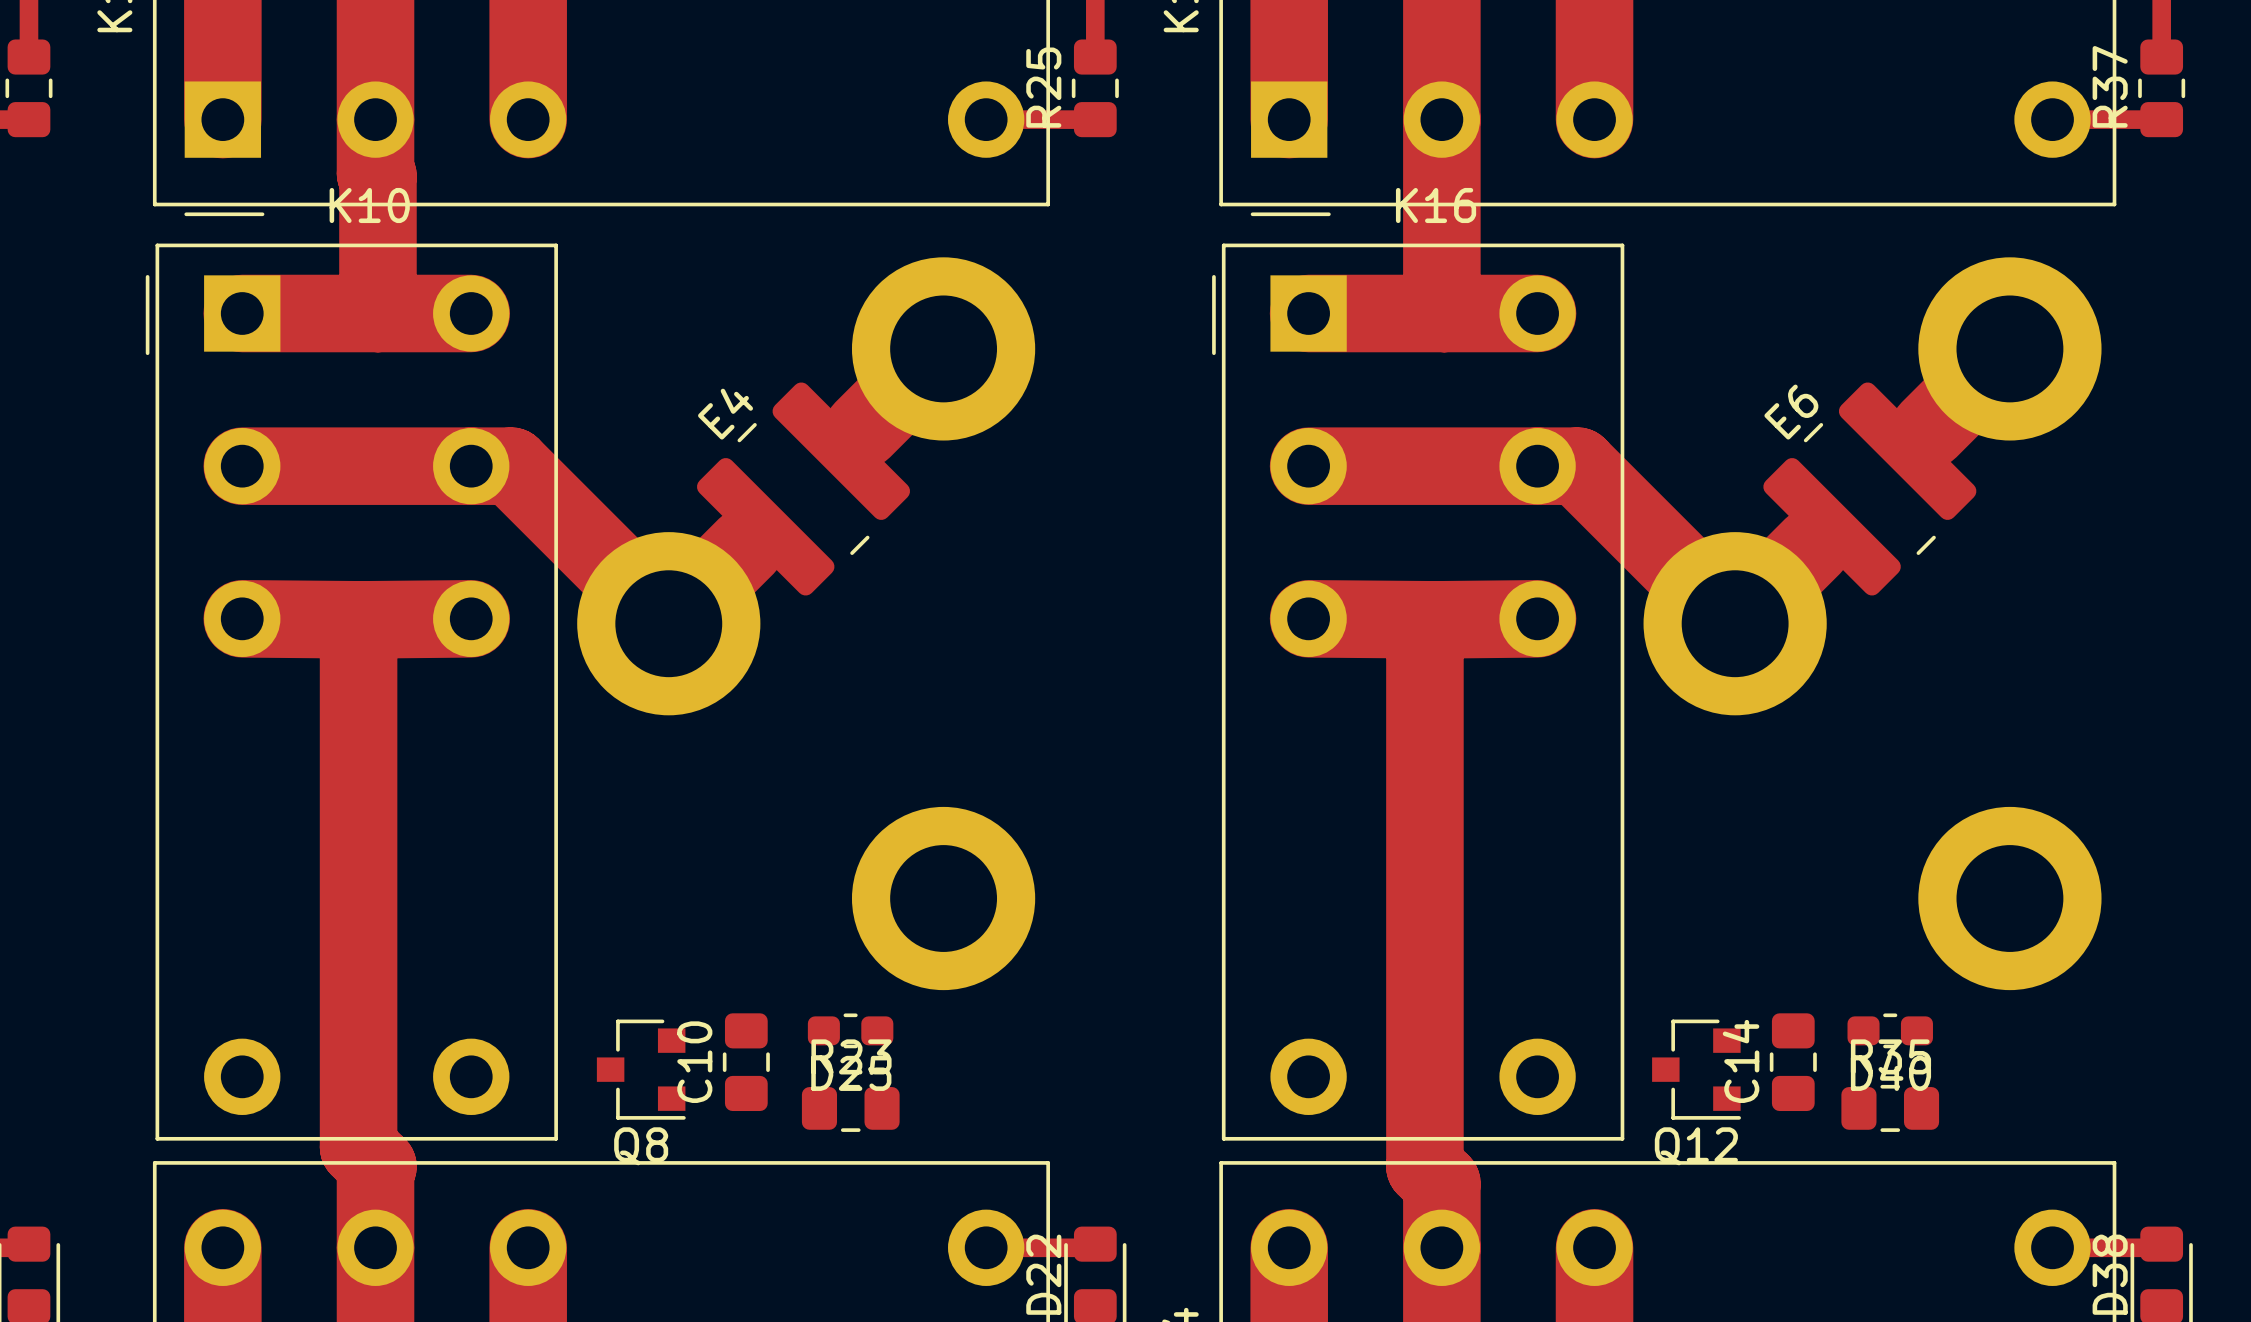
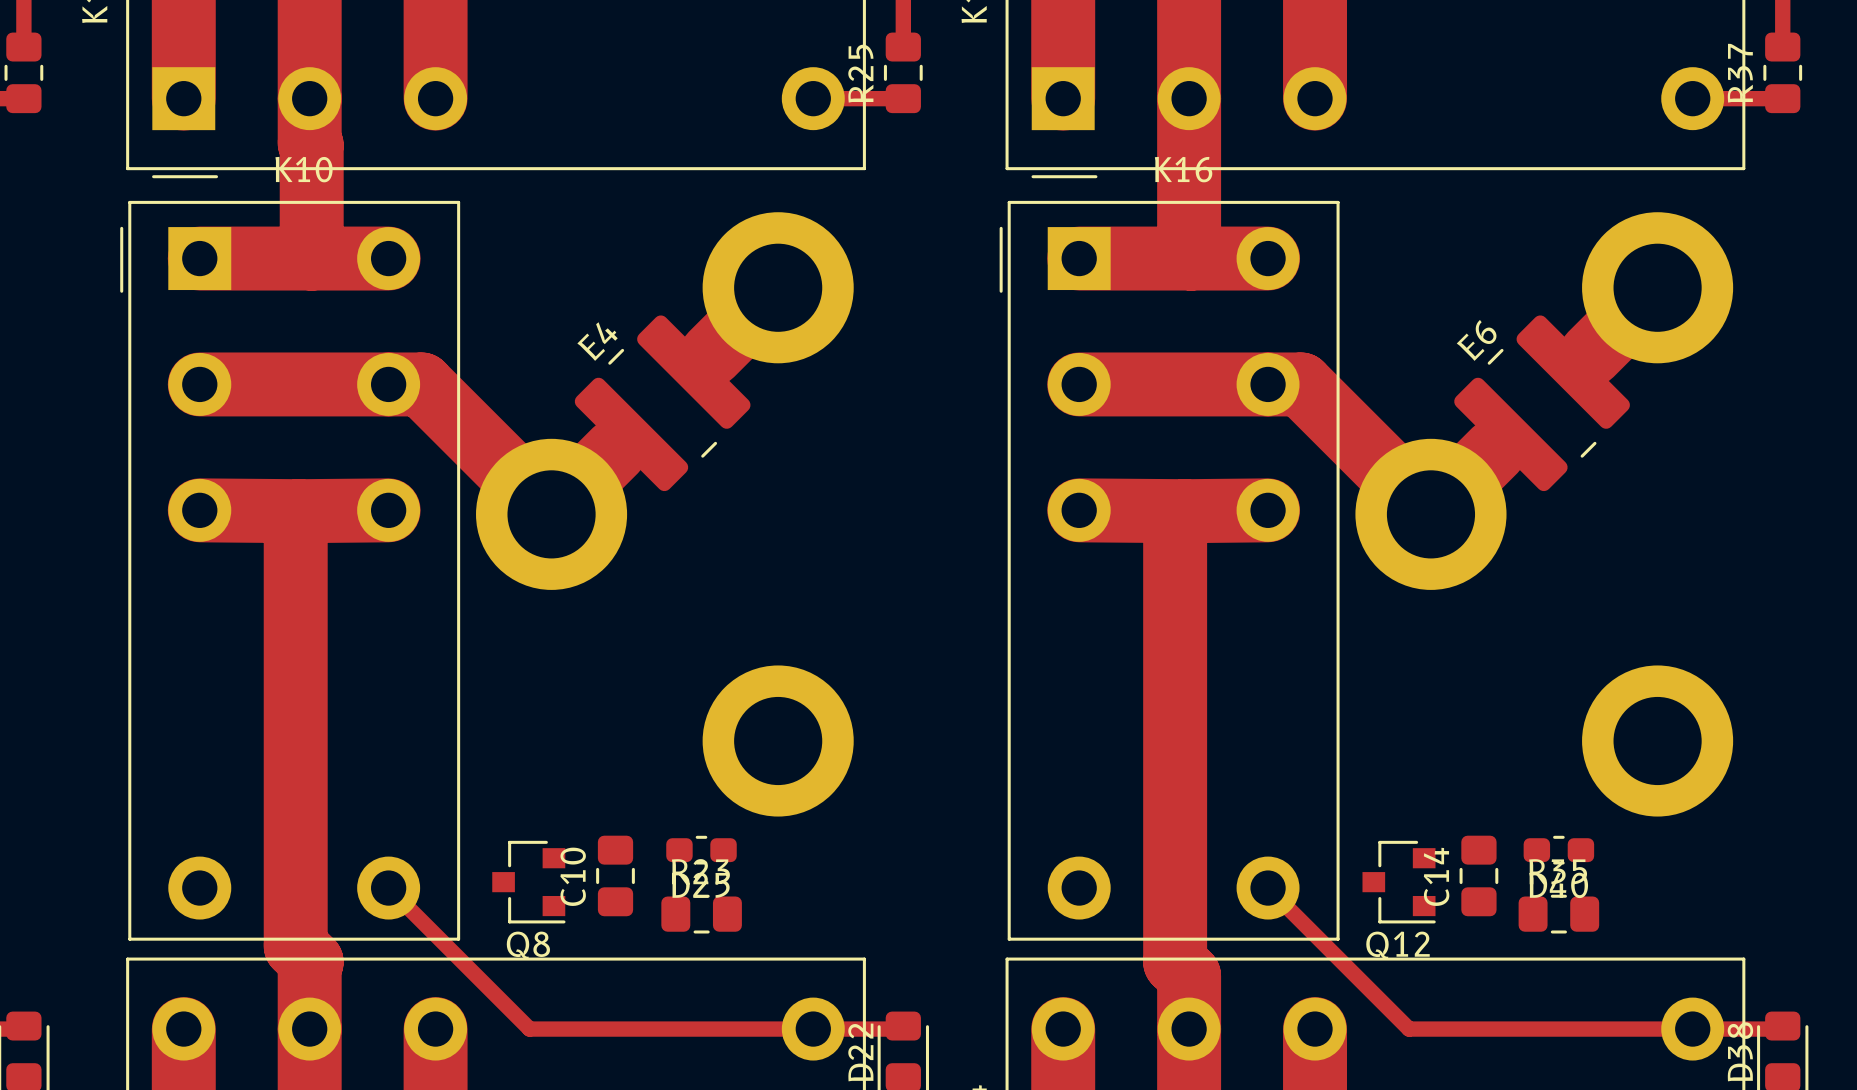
track: none -> (388, 888) (529, 1029) (813, 1029)
track: none -> (1268, 888) (1409, 1029) (1692, 1029)

